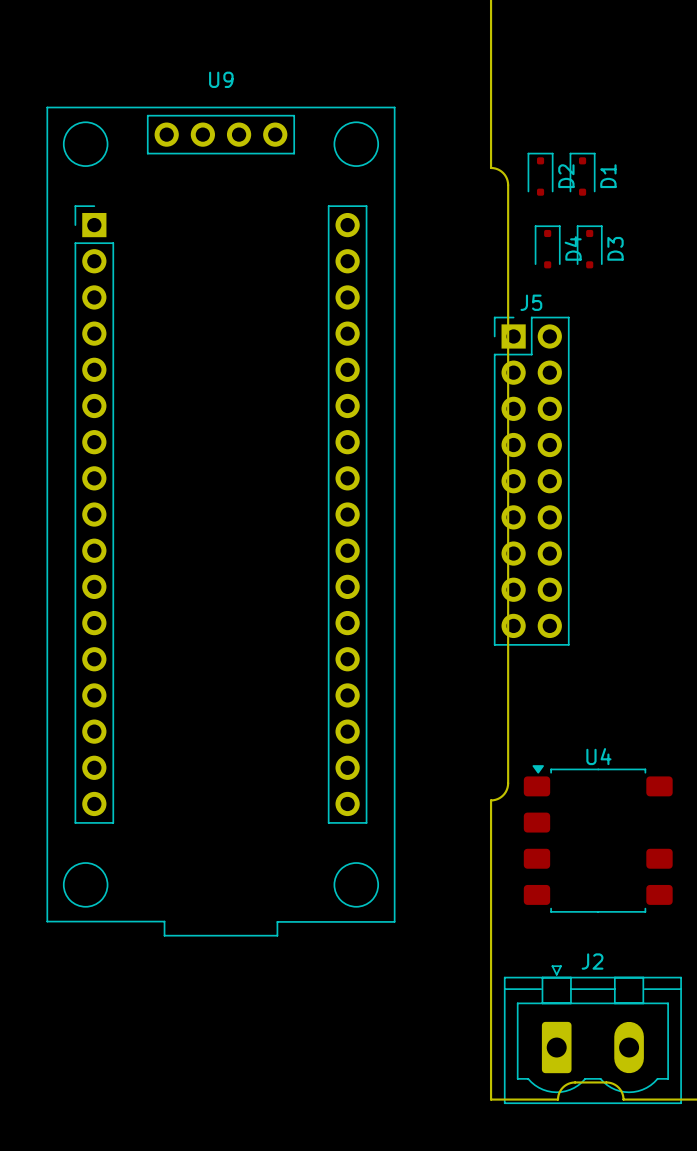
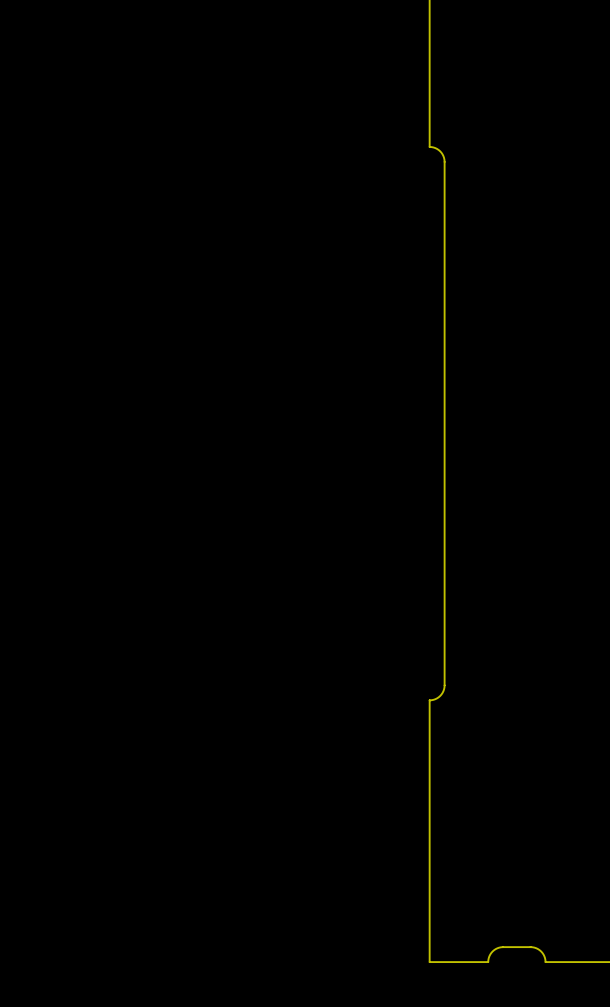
D2: (540, 174) -> none
D1: (582, 174) -> none
D4: (547, 246) -> none
D3: (589, 246) -> none
J5: (531, 481) -> none
U9: (220, 521) -> none
U4: (598, 838) -> none
J2: (592, 1034) -> none

